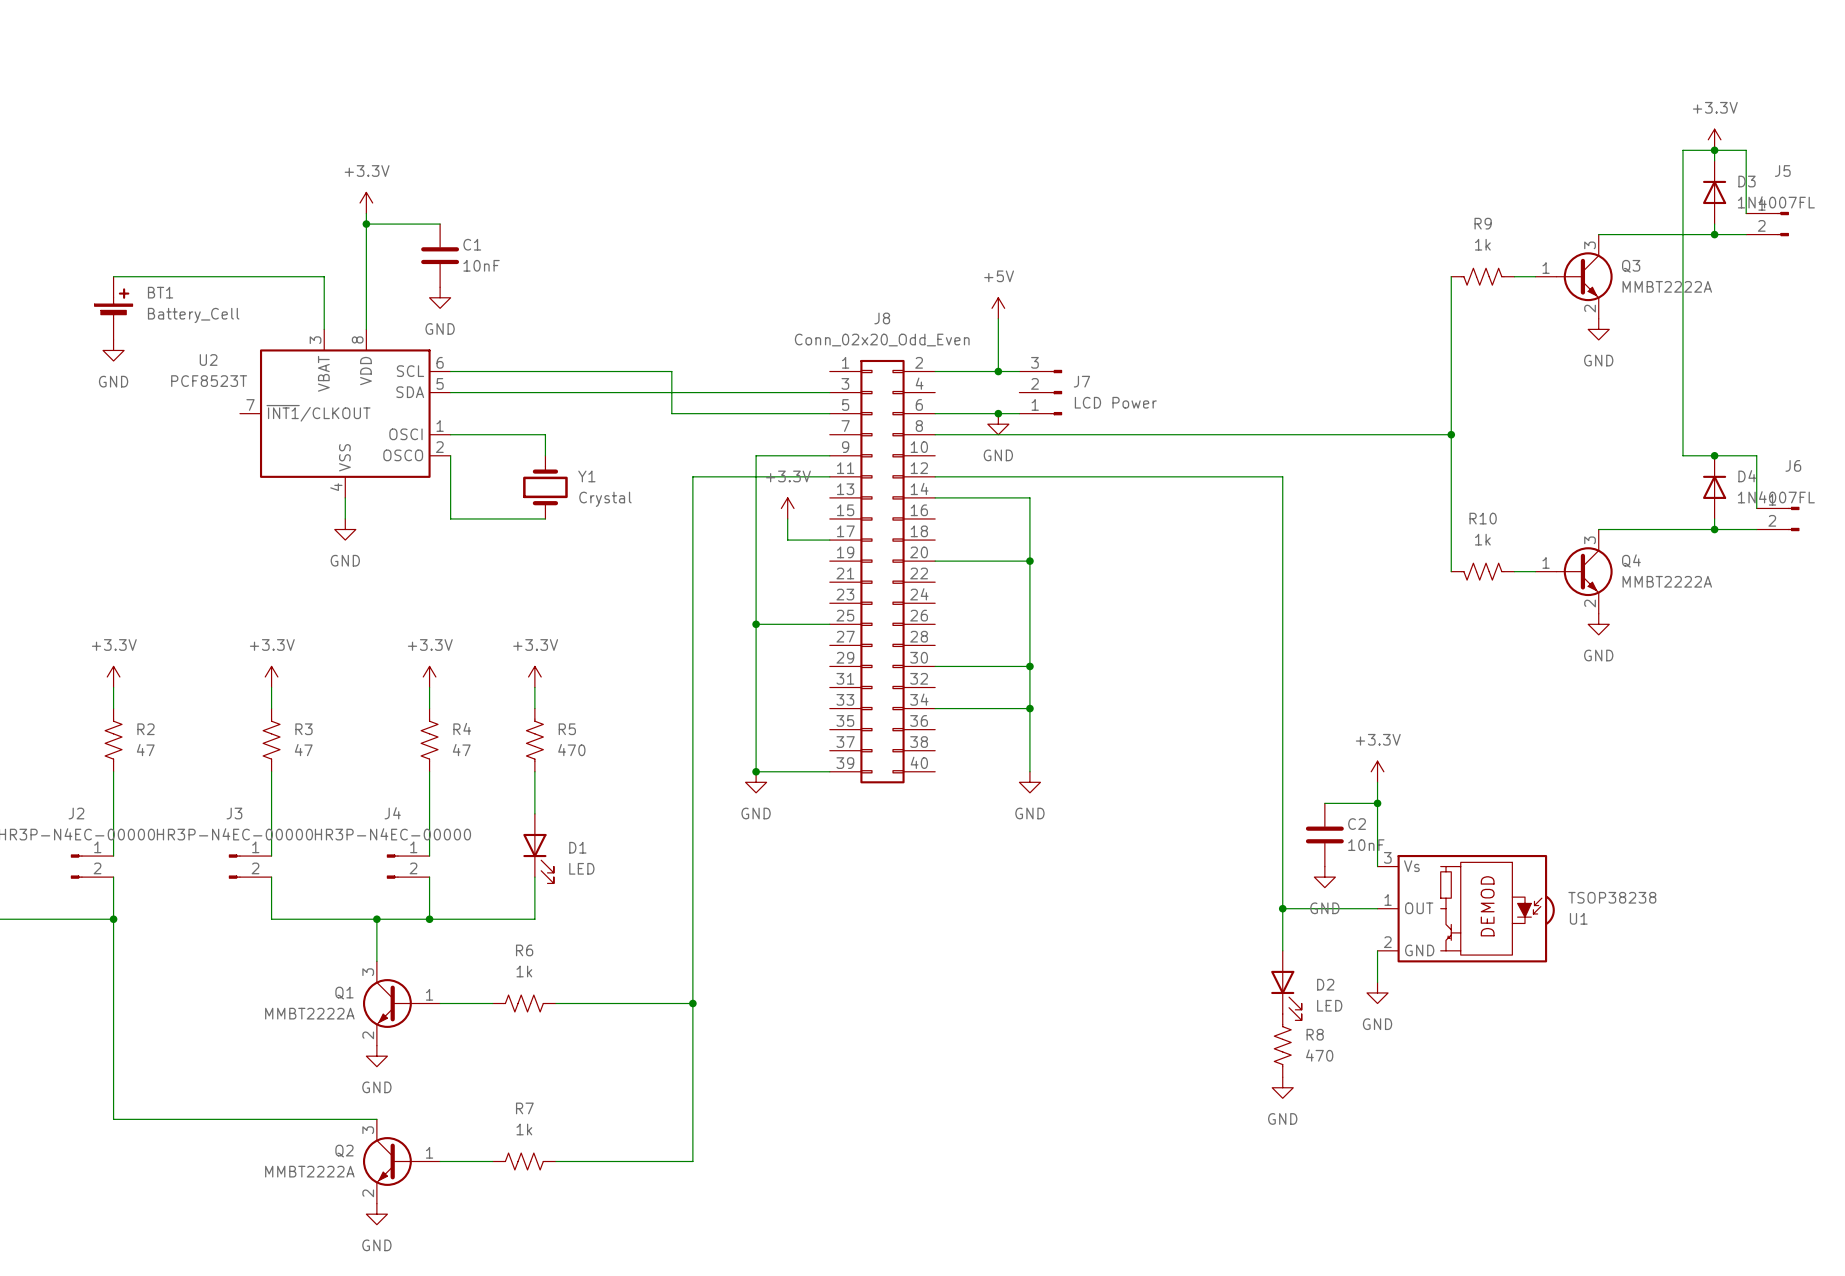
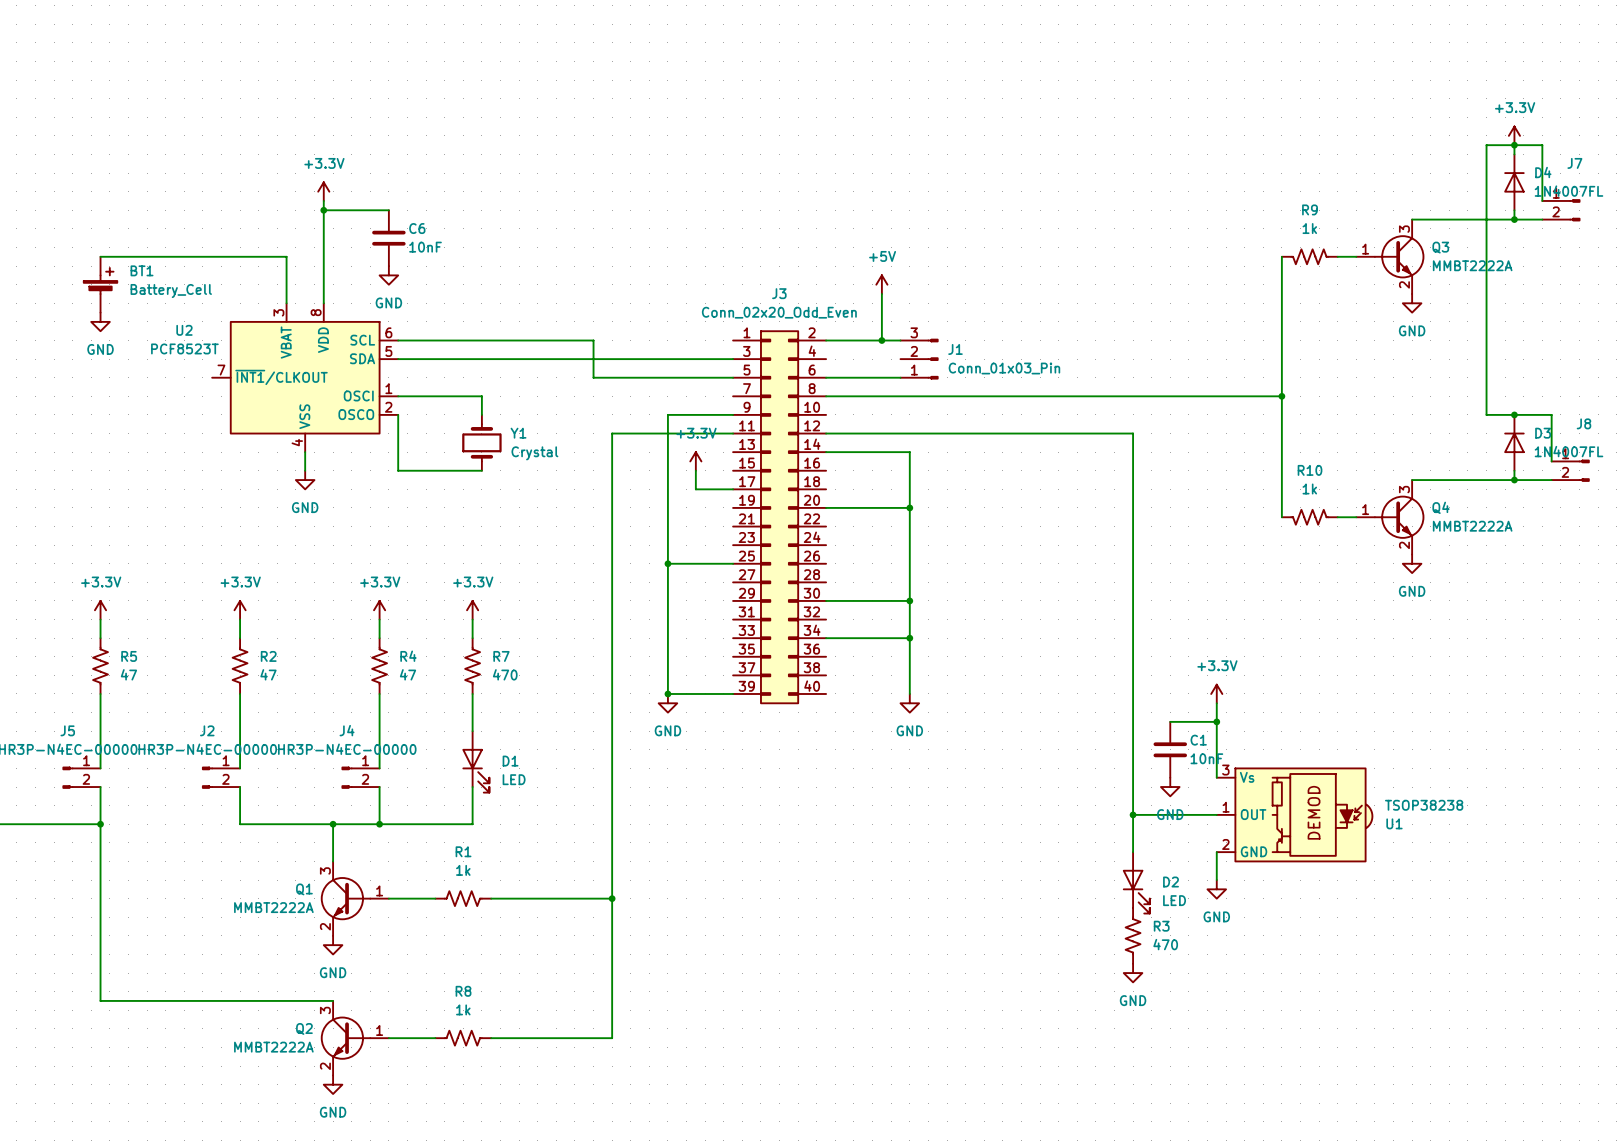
J5 name: J5 (1782, 171) -> J7 (1574, 163)
D3 name: D3 (1747, 181) -> D4 (1543, 172)
C1 name: C1 (472, 244) -> C6 (417, 228)
J8 name: J8 (882, 318) -> J3 (779, 293)
J7 name: J7 (1081, 381) -> J1 (955, 349)
J7 value: LCD Power (1115, 402) -> Conn_01x03_Pin (1004, 368)
junction: (998, 413) -> none
power symbol: GND (998, 424) -> none
J6 name: J6 (1793, 465) -> J8 (1583, 423)
D4 name: D4 (1747, 476) -> D3 (1543, 433)
R2 name: R2 (146, 729) -> R5 (129, 656)
R3 name: R3 (303, 729) -> R2 (268, 656)
R5 name: R5 (567, 729) -> R7 (501, 656)
J2 name: J2 (76, 813) -> J5 (67, 730)
J3 name: J3 (234, 813) -> J2 (207, 730)
C2 name: C2 (1357, 824) -> C1 (1198, 740)
R6 name: R6 (524, 950) -> R1 (463, 851)
R8 name: R8 (1315, 1034) -> R3 (1161, 926)
R7 name: R7 (524, 1108) -> R8 (463, 991)

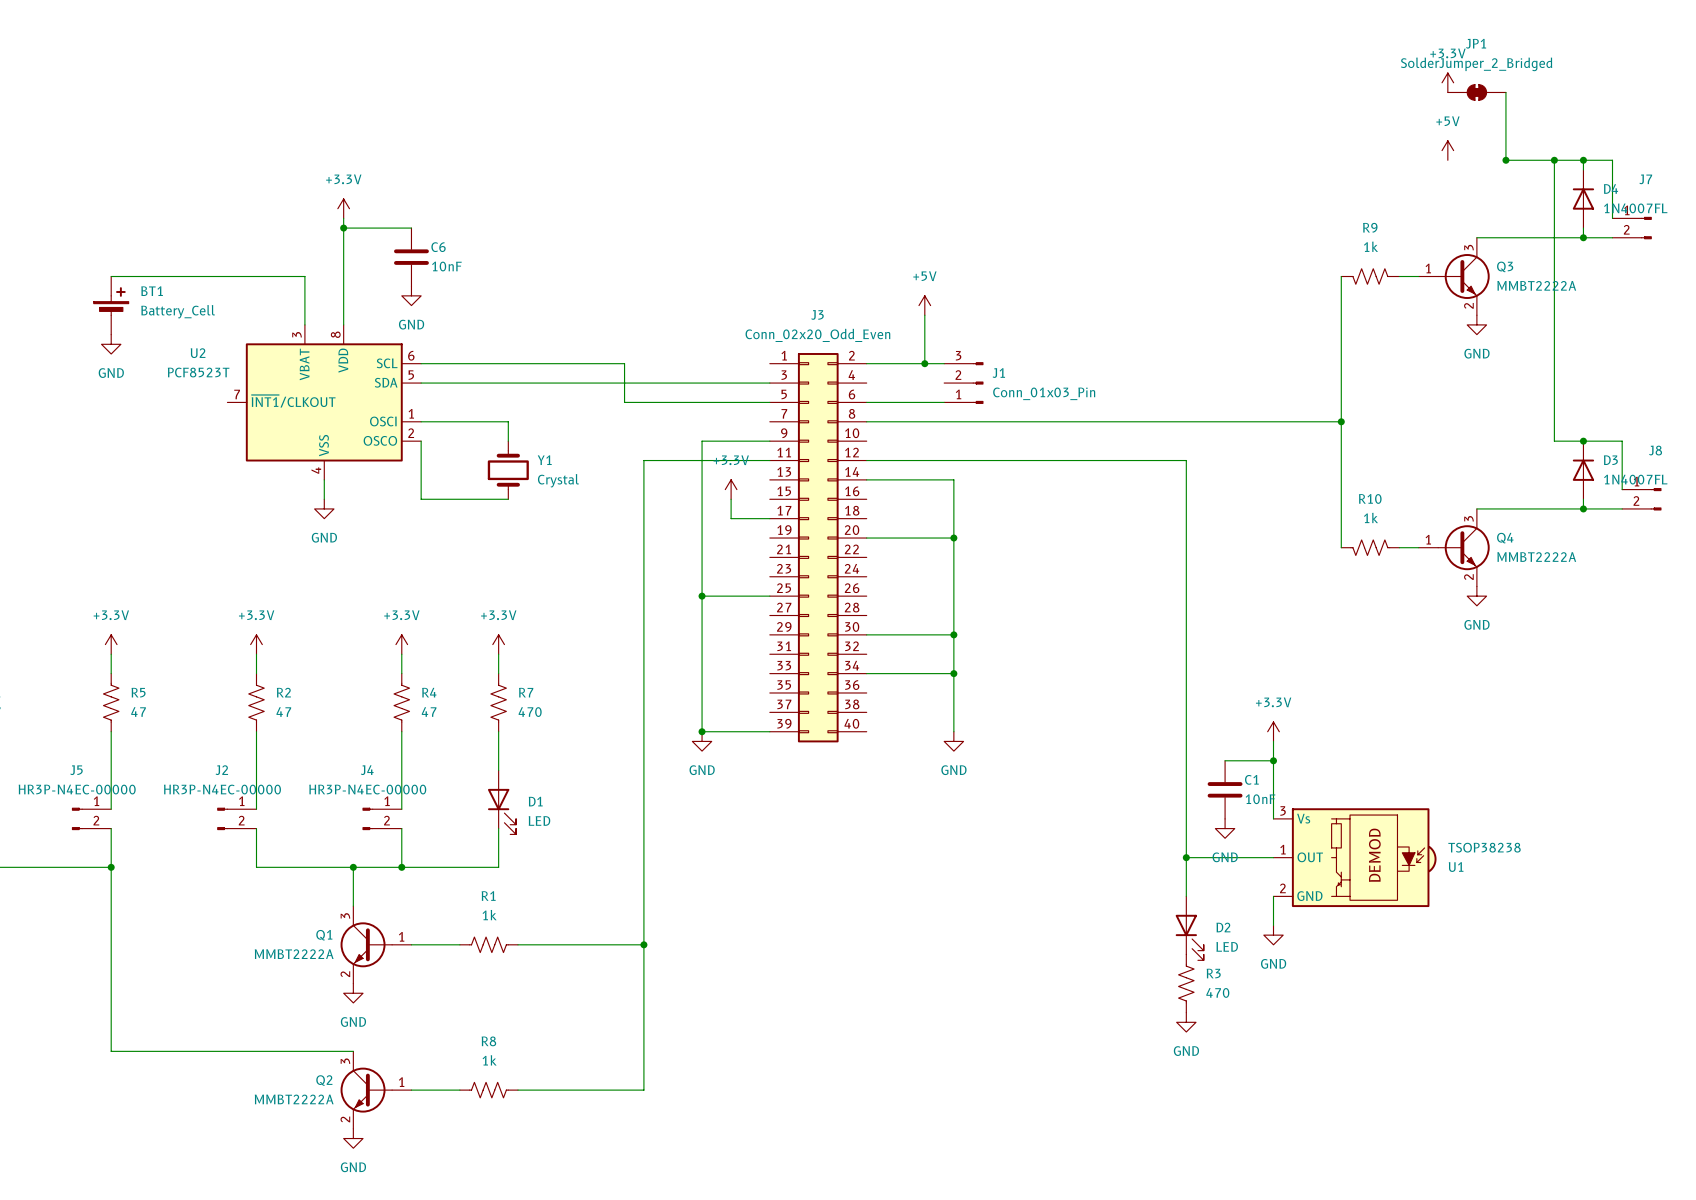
JP1: none -> SolderJumper_2_Bridged (1476, 92)
wire: none -> (1505, 92) (1505, 160) (1554, 160)
power symbol: none -> +5V (1447, 150)
power symbol position: +3.3V (1514, 135) -> +3.3V (1447, 82)
junction: none -> (1505, 160)
junction: none -> (1554, 160)

